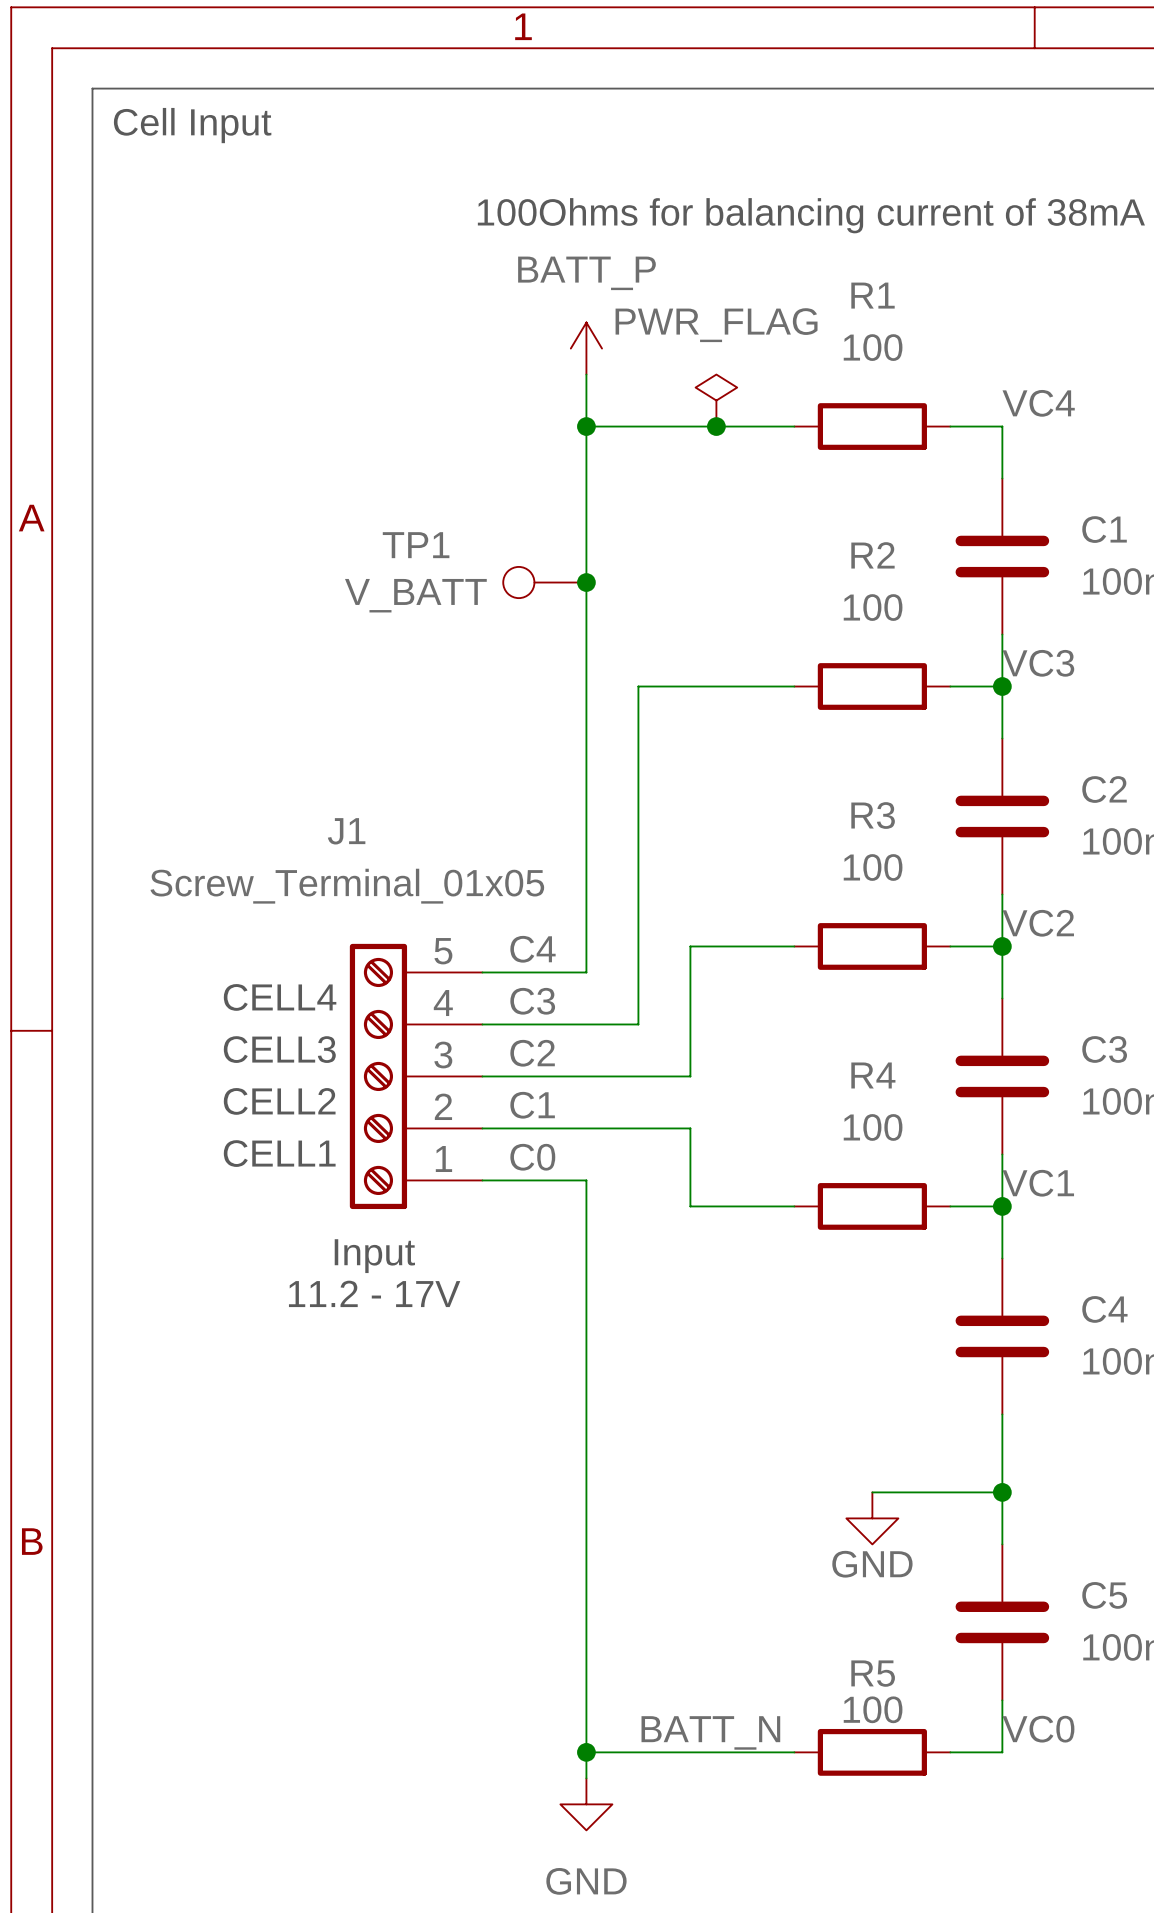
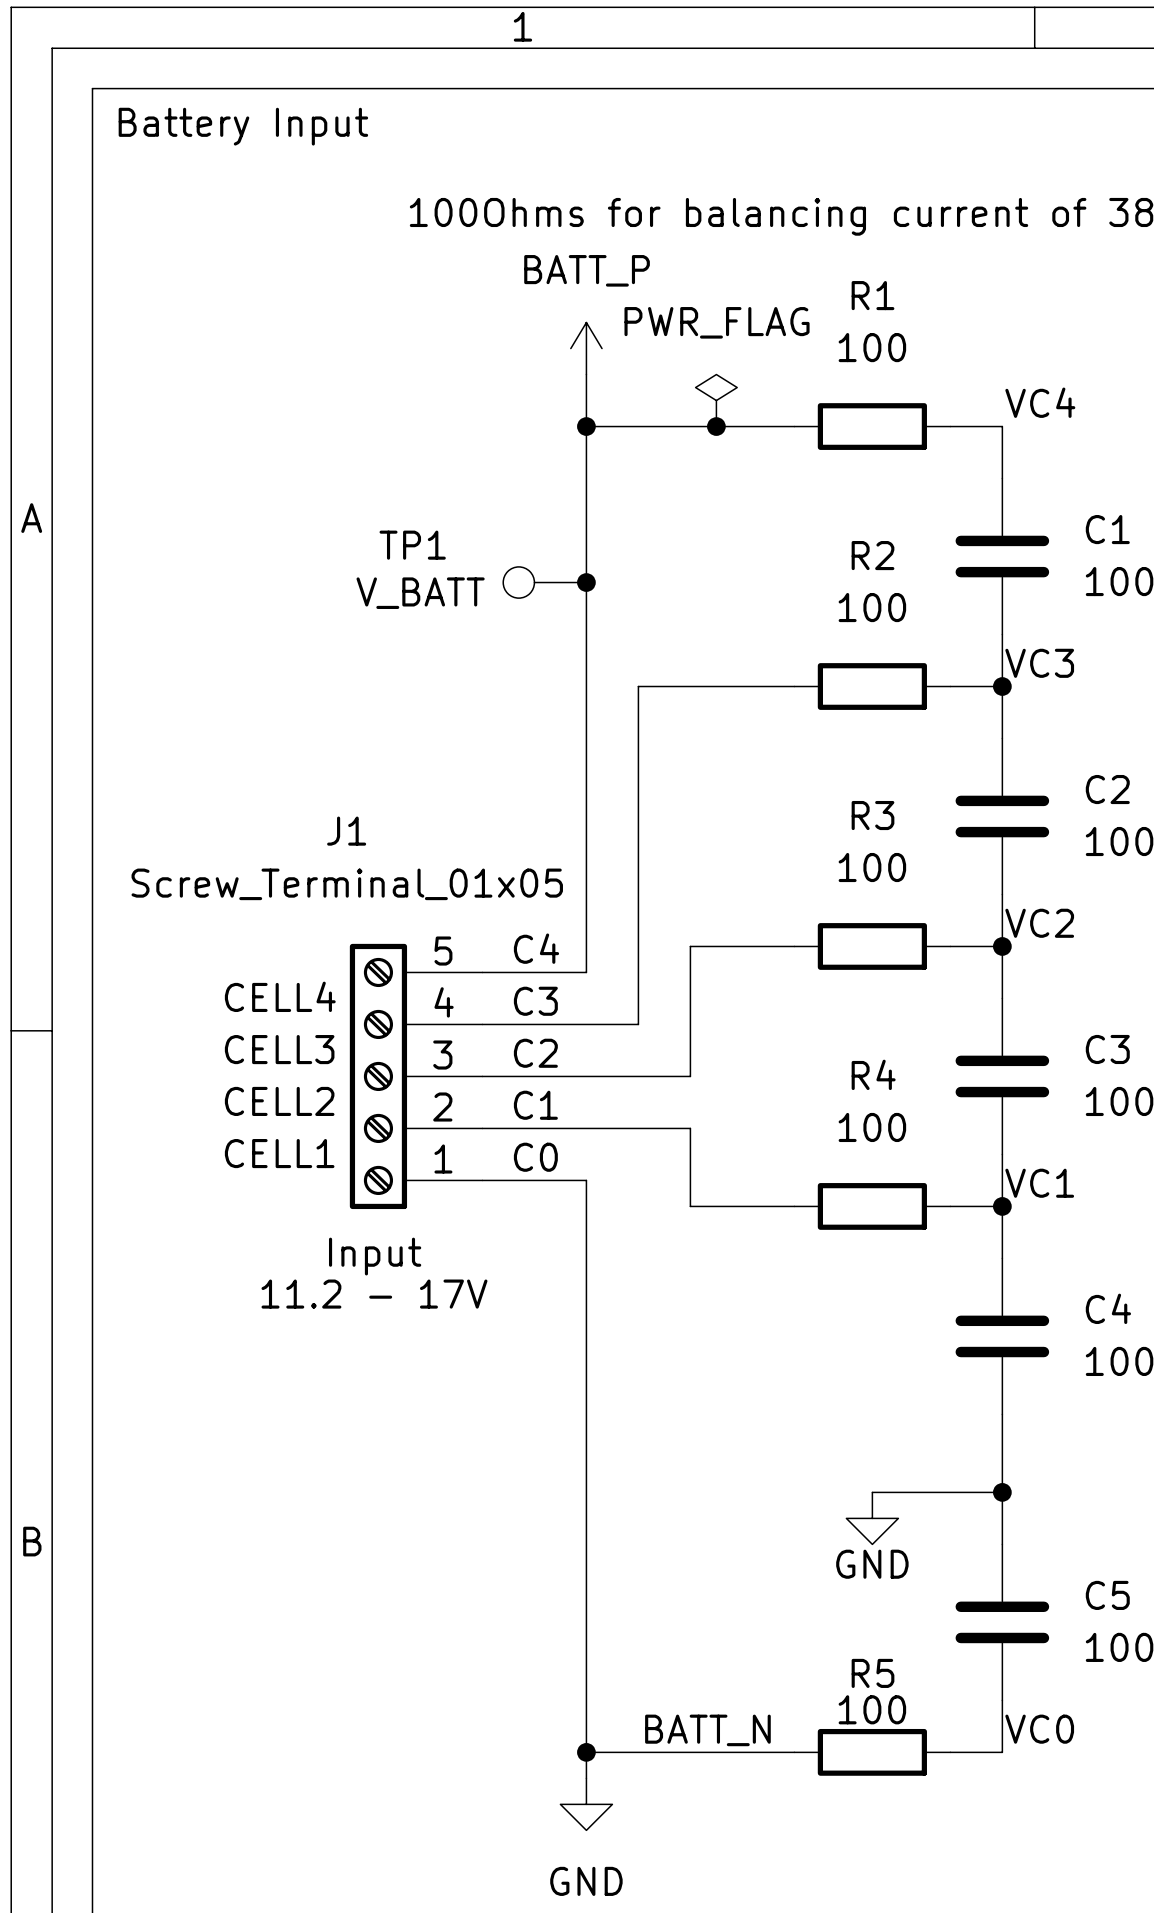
text: Cell Input (192, 125) -> Battery Input (243, 126)

